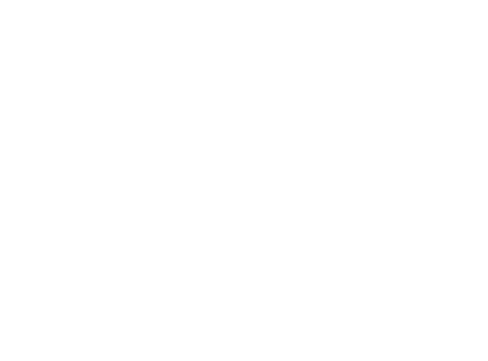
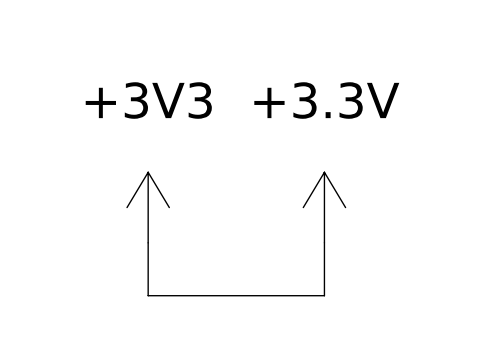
power symbol: none -> +3V3 (148, 207)
power symbol: none -> +3.3V (324, 207)
wire: none -> (148, 242) (148, 295) (324, 295) (324, 242)

